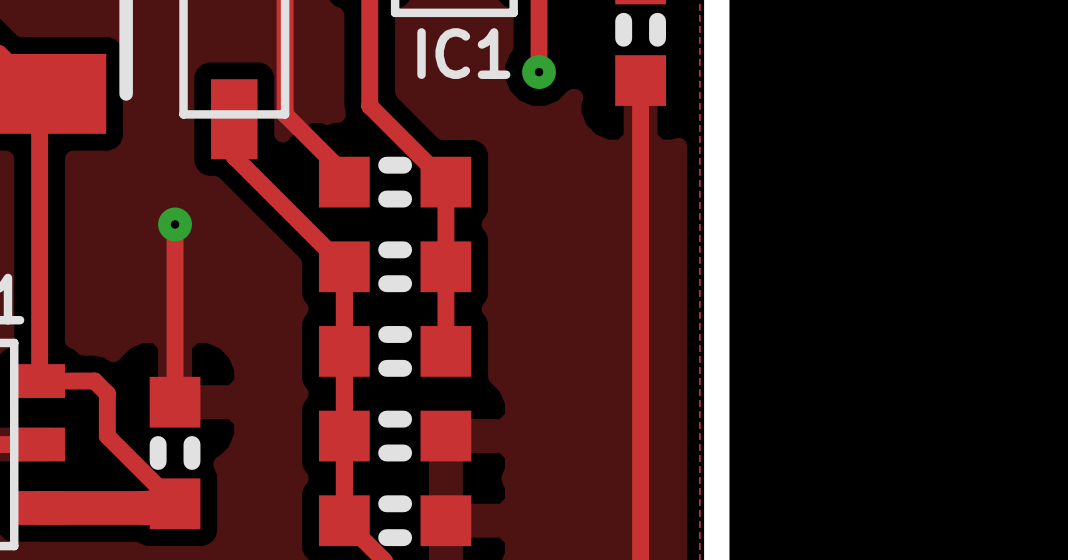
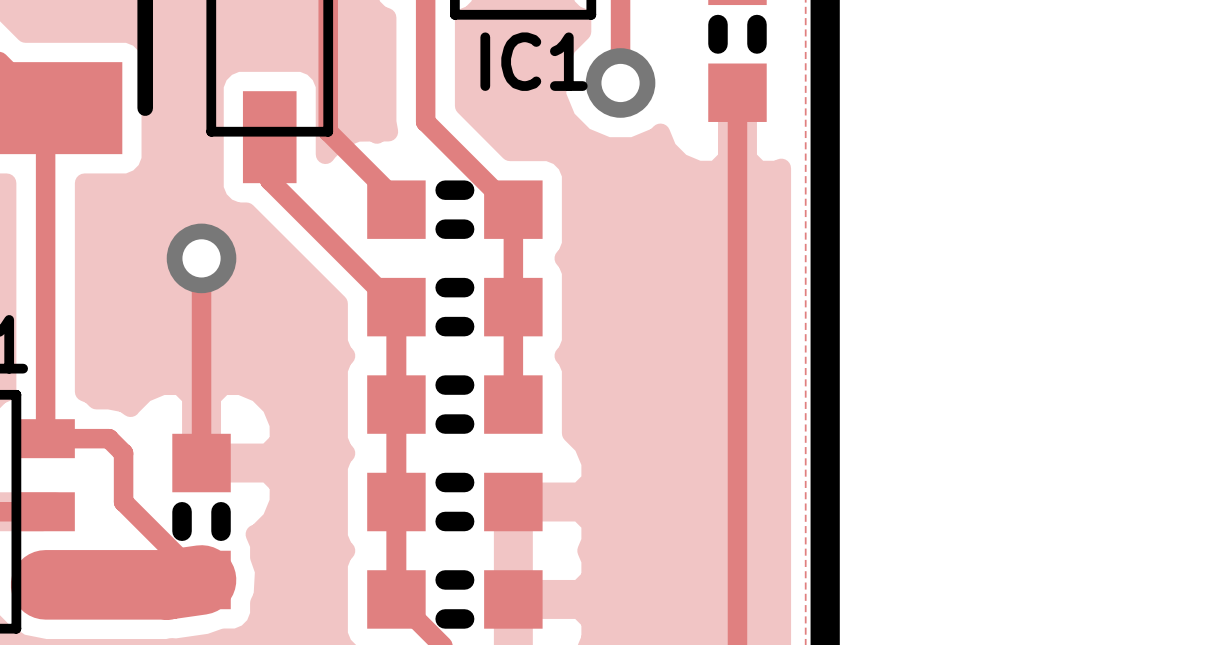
via size: [522, 55, 556, 90] -> [585, 48, 656, 118]
via size: [158, 207, 192, 242] -> [166, 223, 237, 294]
track width: thin (175, 503) (145, 508) (39, 508) -> thick (201, 579) (167, 584) (45, 584)

